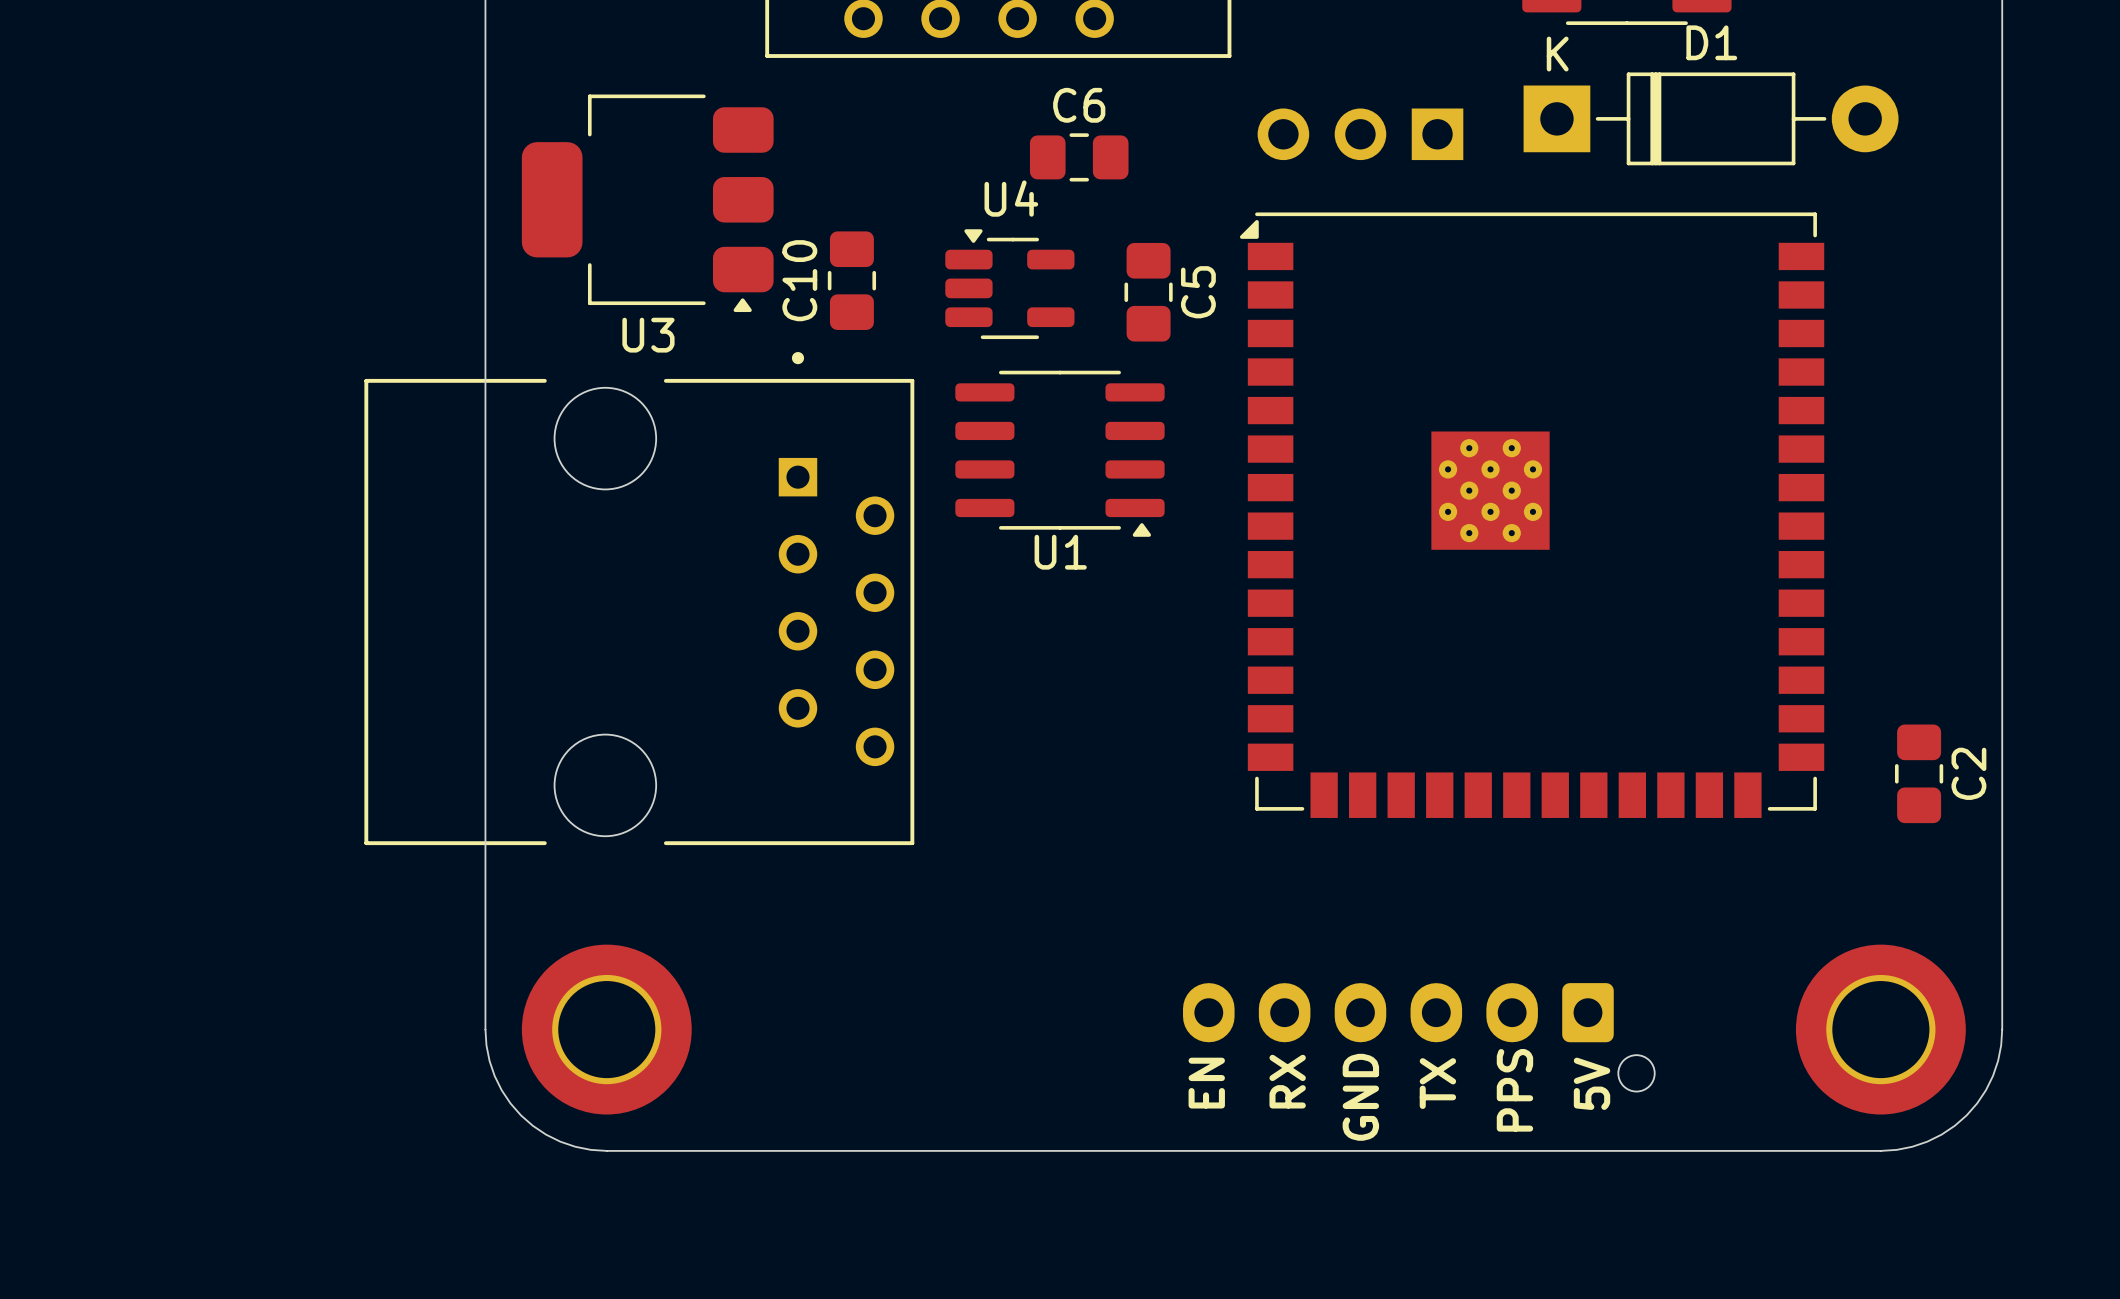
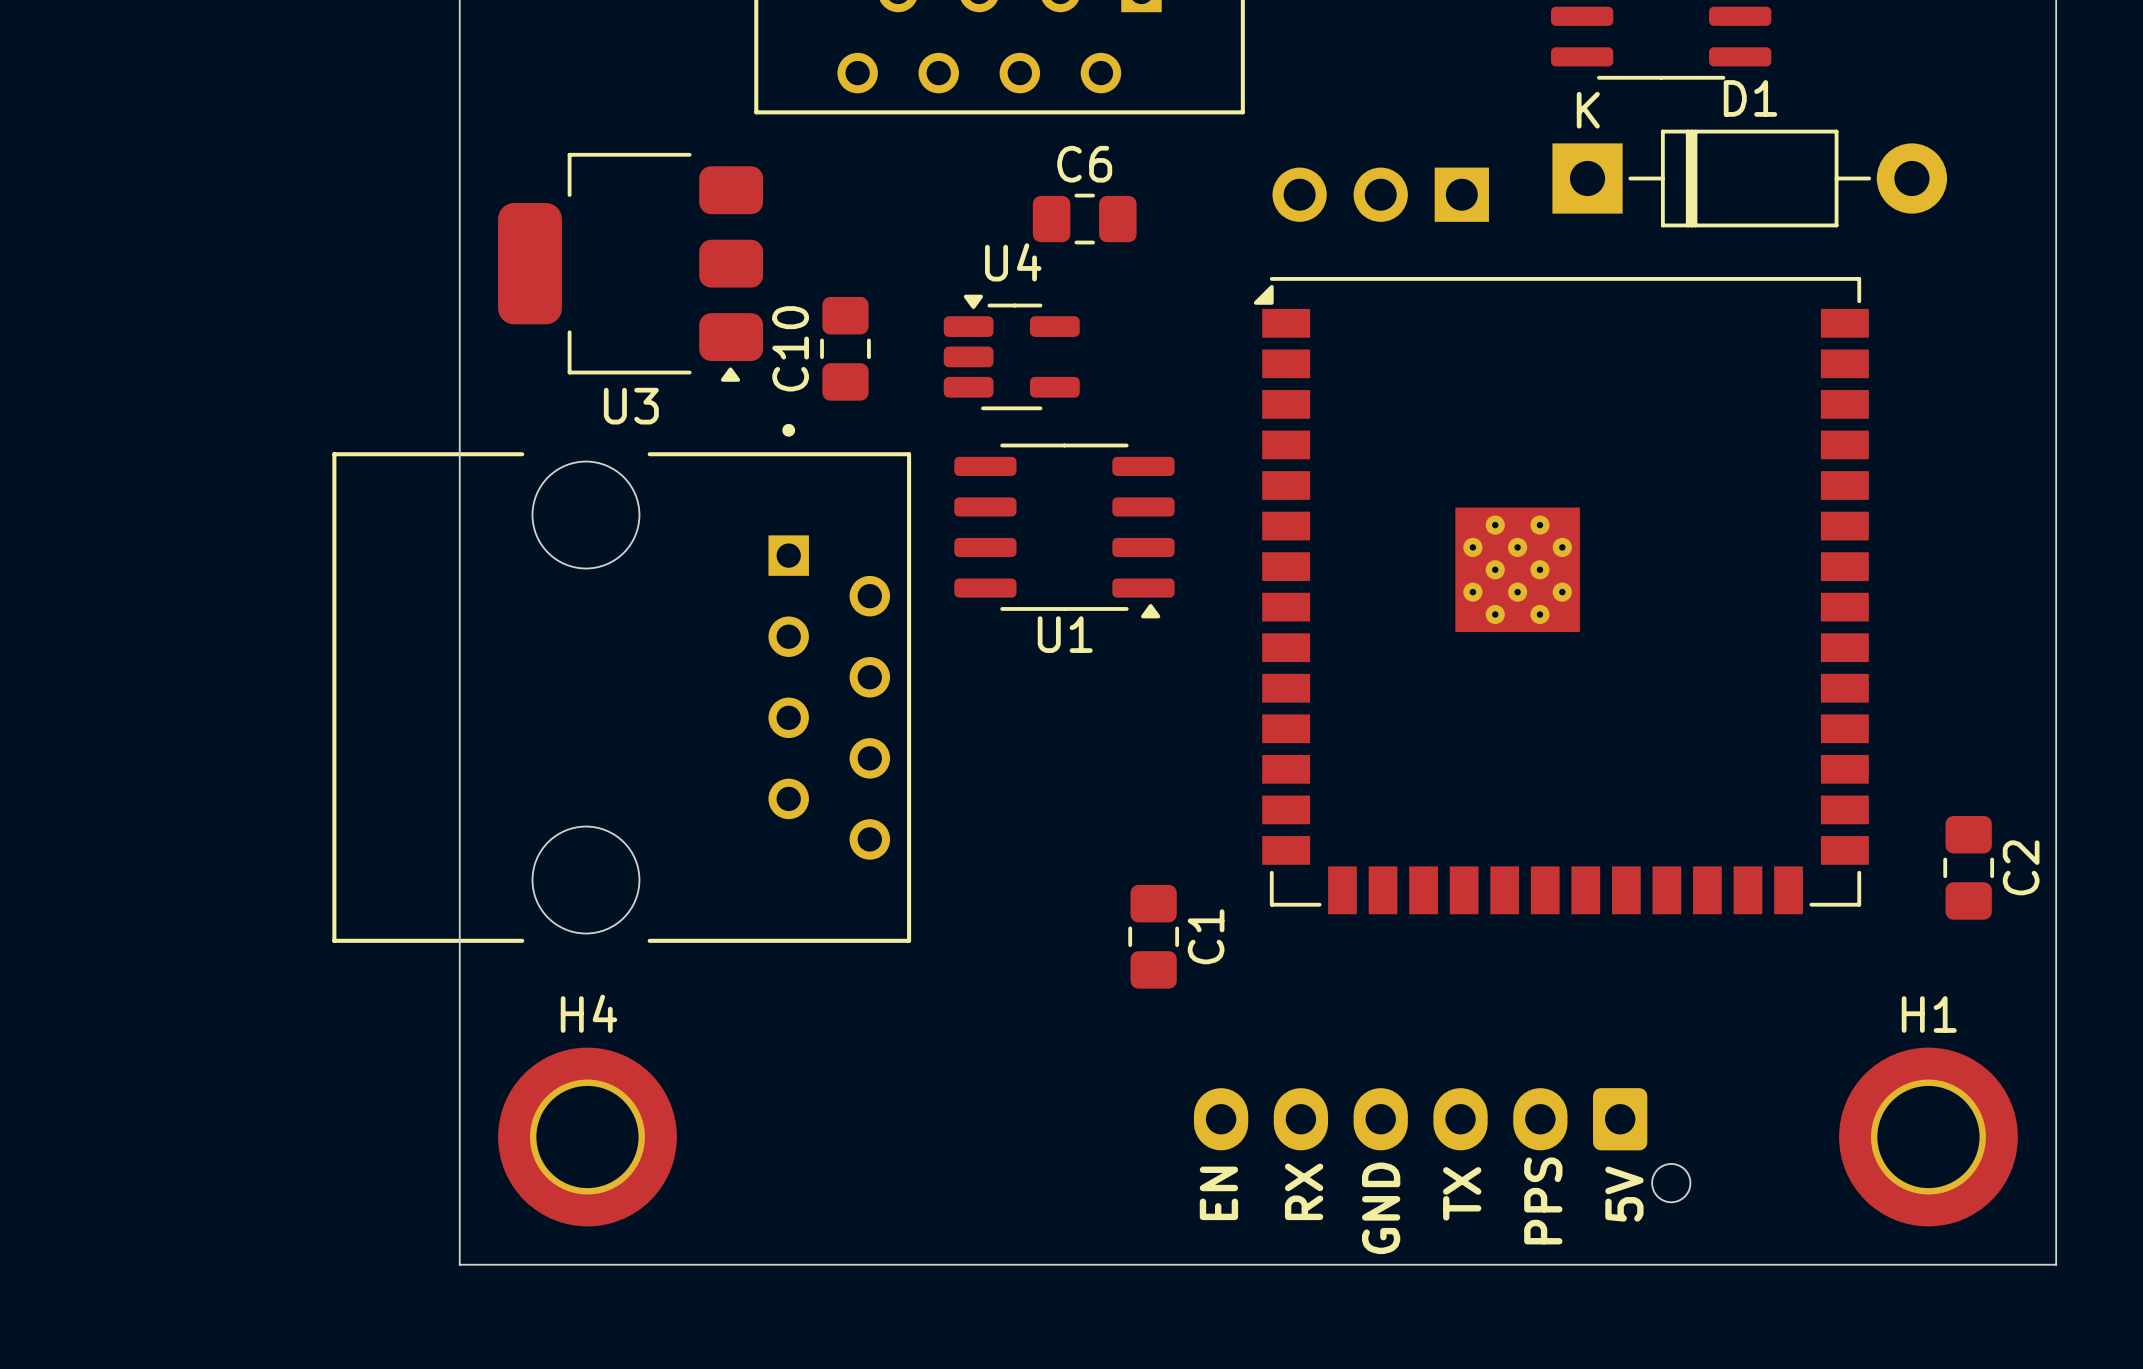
C5: (1148, 292) -> none
C1: none -> (1153, 936)
H4 name: none -> H4 (588, 1013)
H1 name: none -> H1 (1929, 1014)
board edge: (485, 1029) (489, 1060) (494, 1076) (501, 1090) (520, 1115) (546, 1134) (560, 1141) (590, 1149) (606, 1150) -> (459, 1137) (459, 1264) (587, 1264)
board edge: (2002, 1029) (1998, 1060) (1992, 1076) (1977, 1103) (1966, 1115) (1941, 1134) (1927, 1141) (1912, 1146) (1880, 1150) -> (2056, 1137) (2056, 1264) (1928, 1264)

